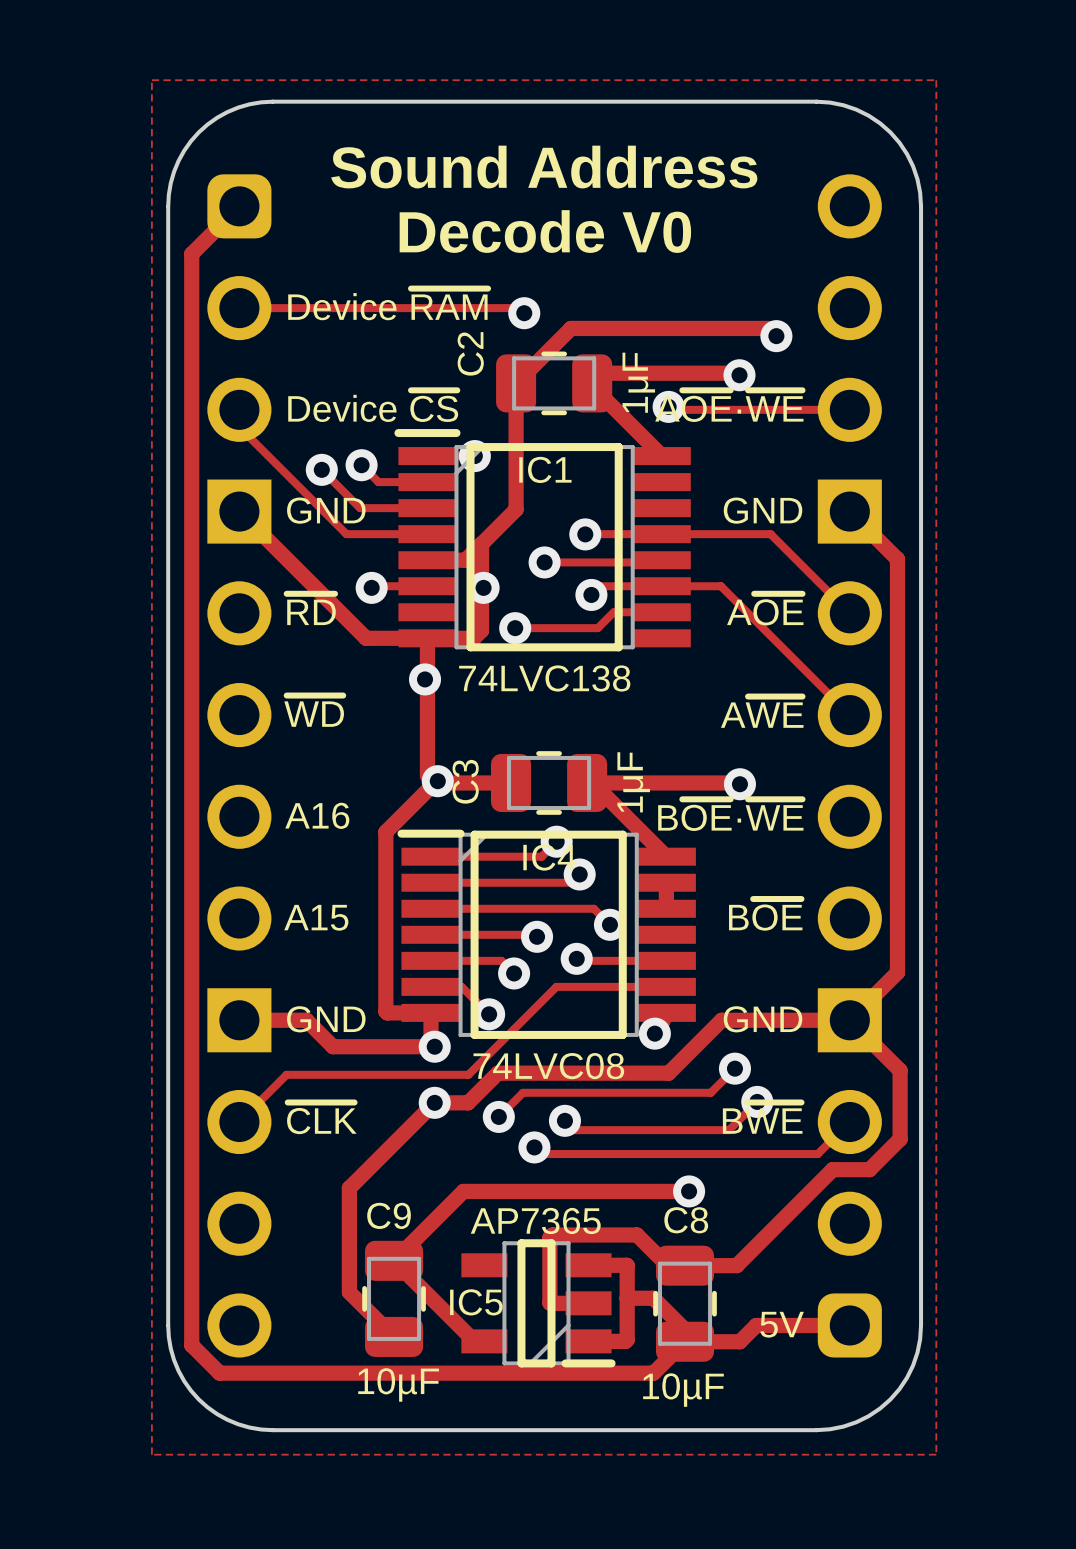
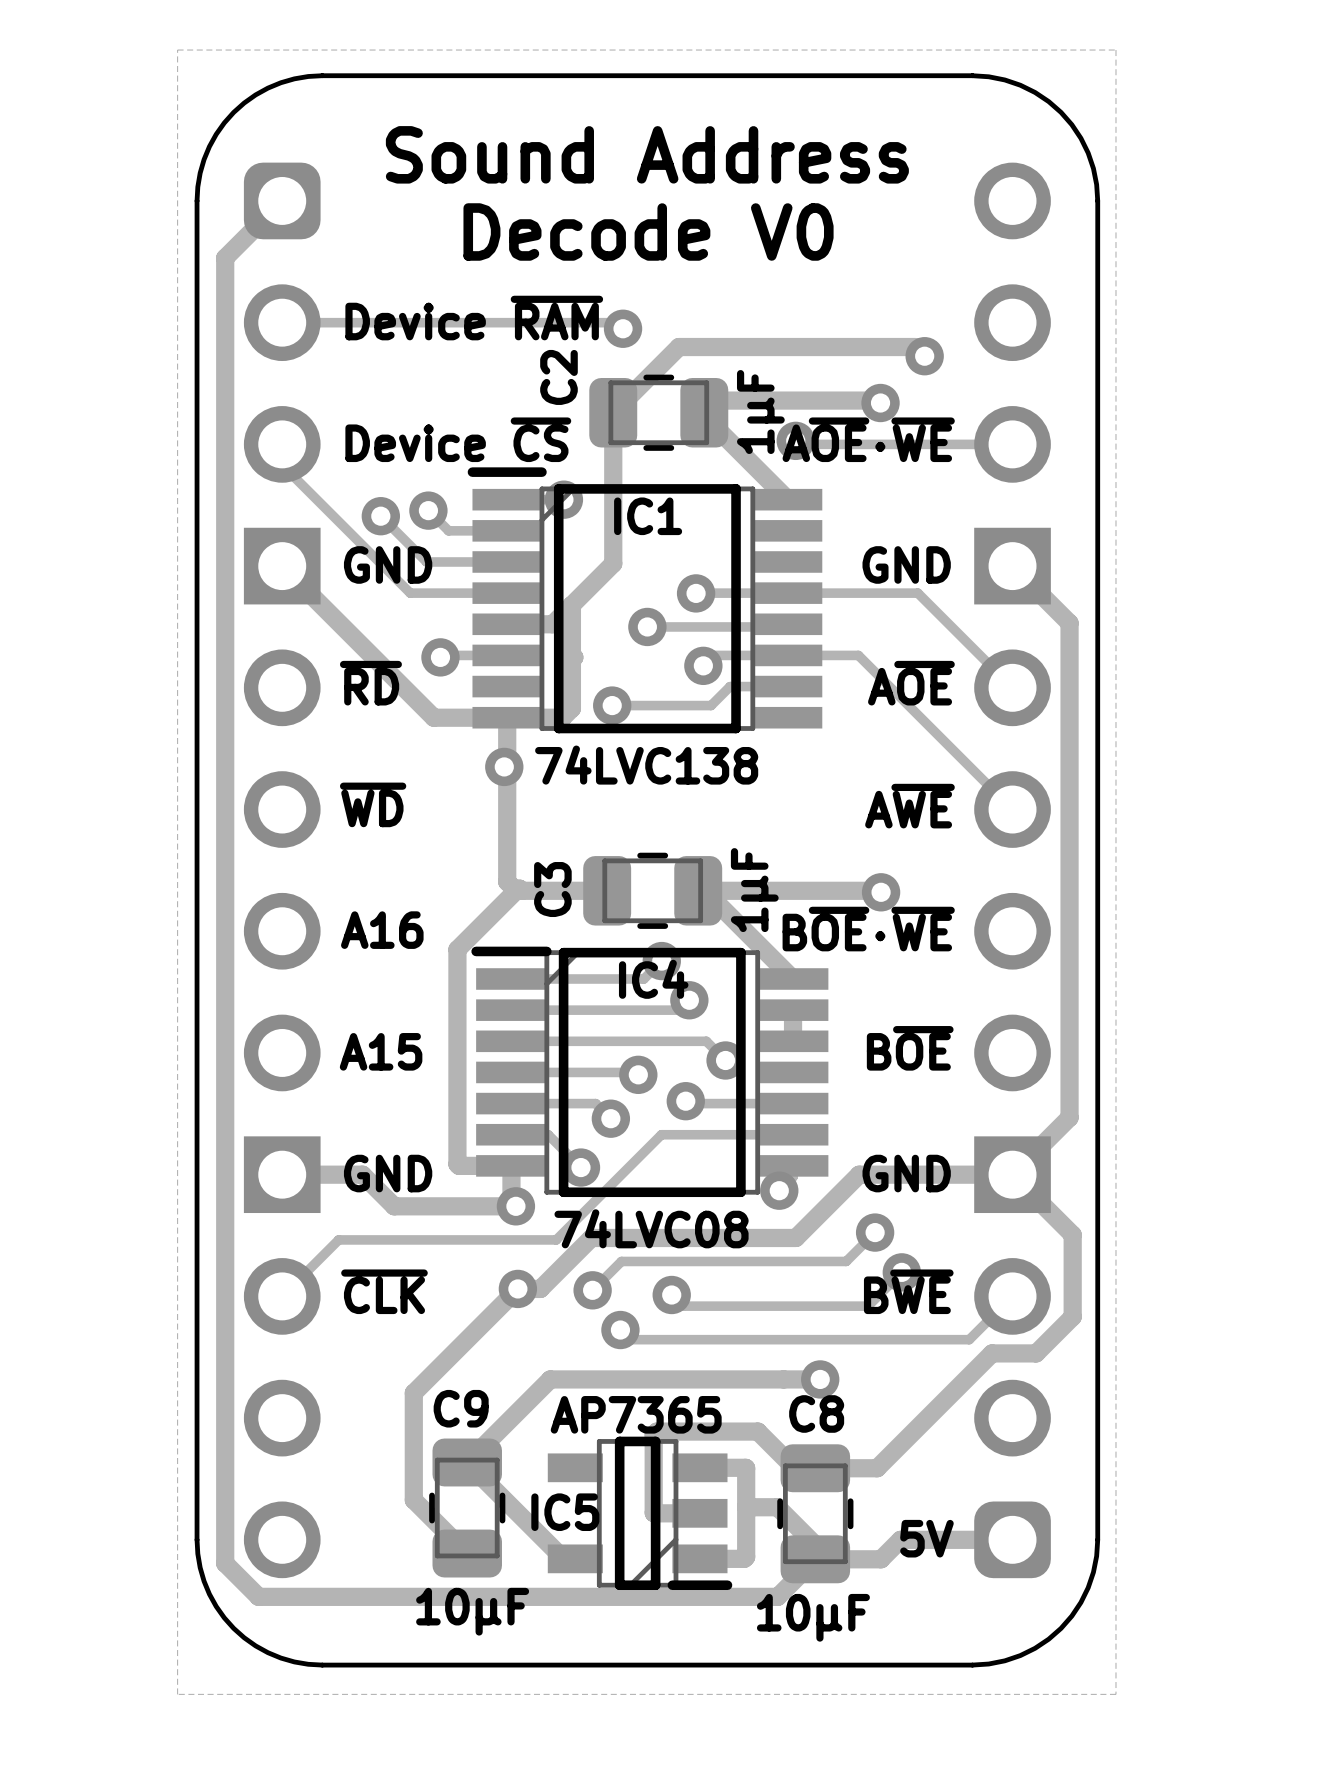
via: (483, 587) -> none
via: (437, 781) -> none
via position: (434, 1102) -> (517, 1288)
track: (468, 1102) (434, 1102) (349, 1188) (349, 1202) -> (555, 1273) (540, 1288) (517, 1288) (413, 1393)
track: (534, 1147) (541, 1154) (817, 1154) -> (620, 1330) (630, 1339) (969, 1339) (974, 1334)
via position: (534, 1147) -> (620, 1330)

